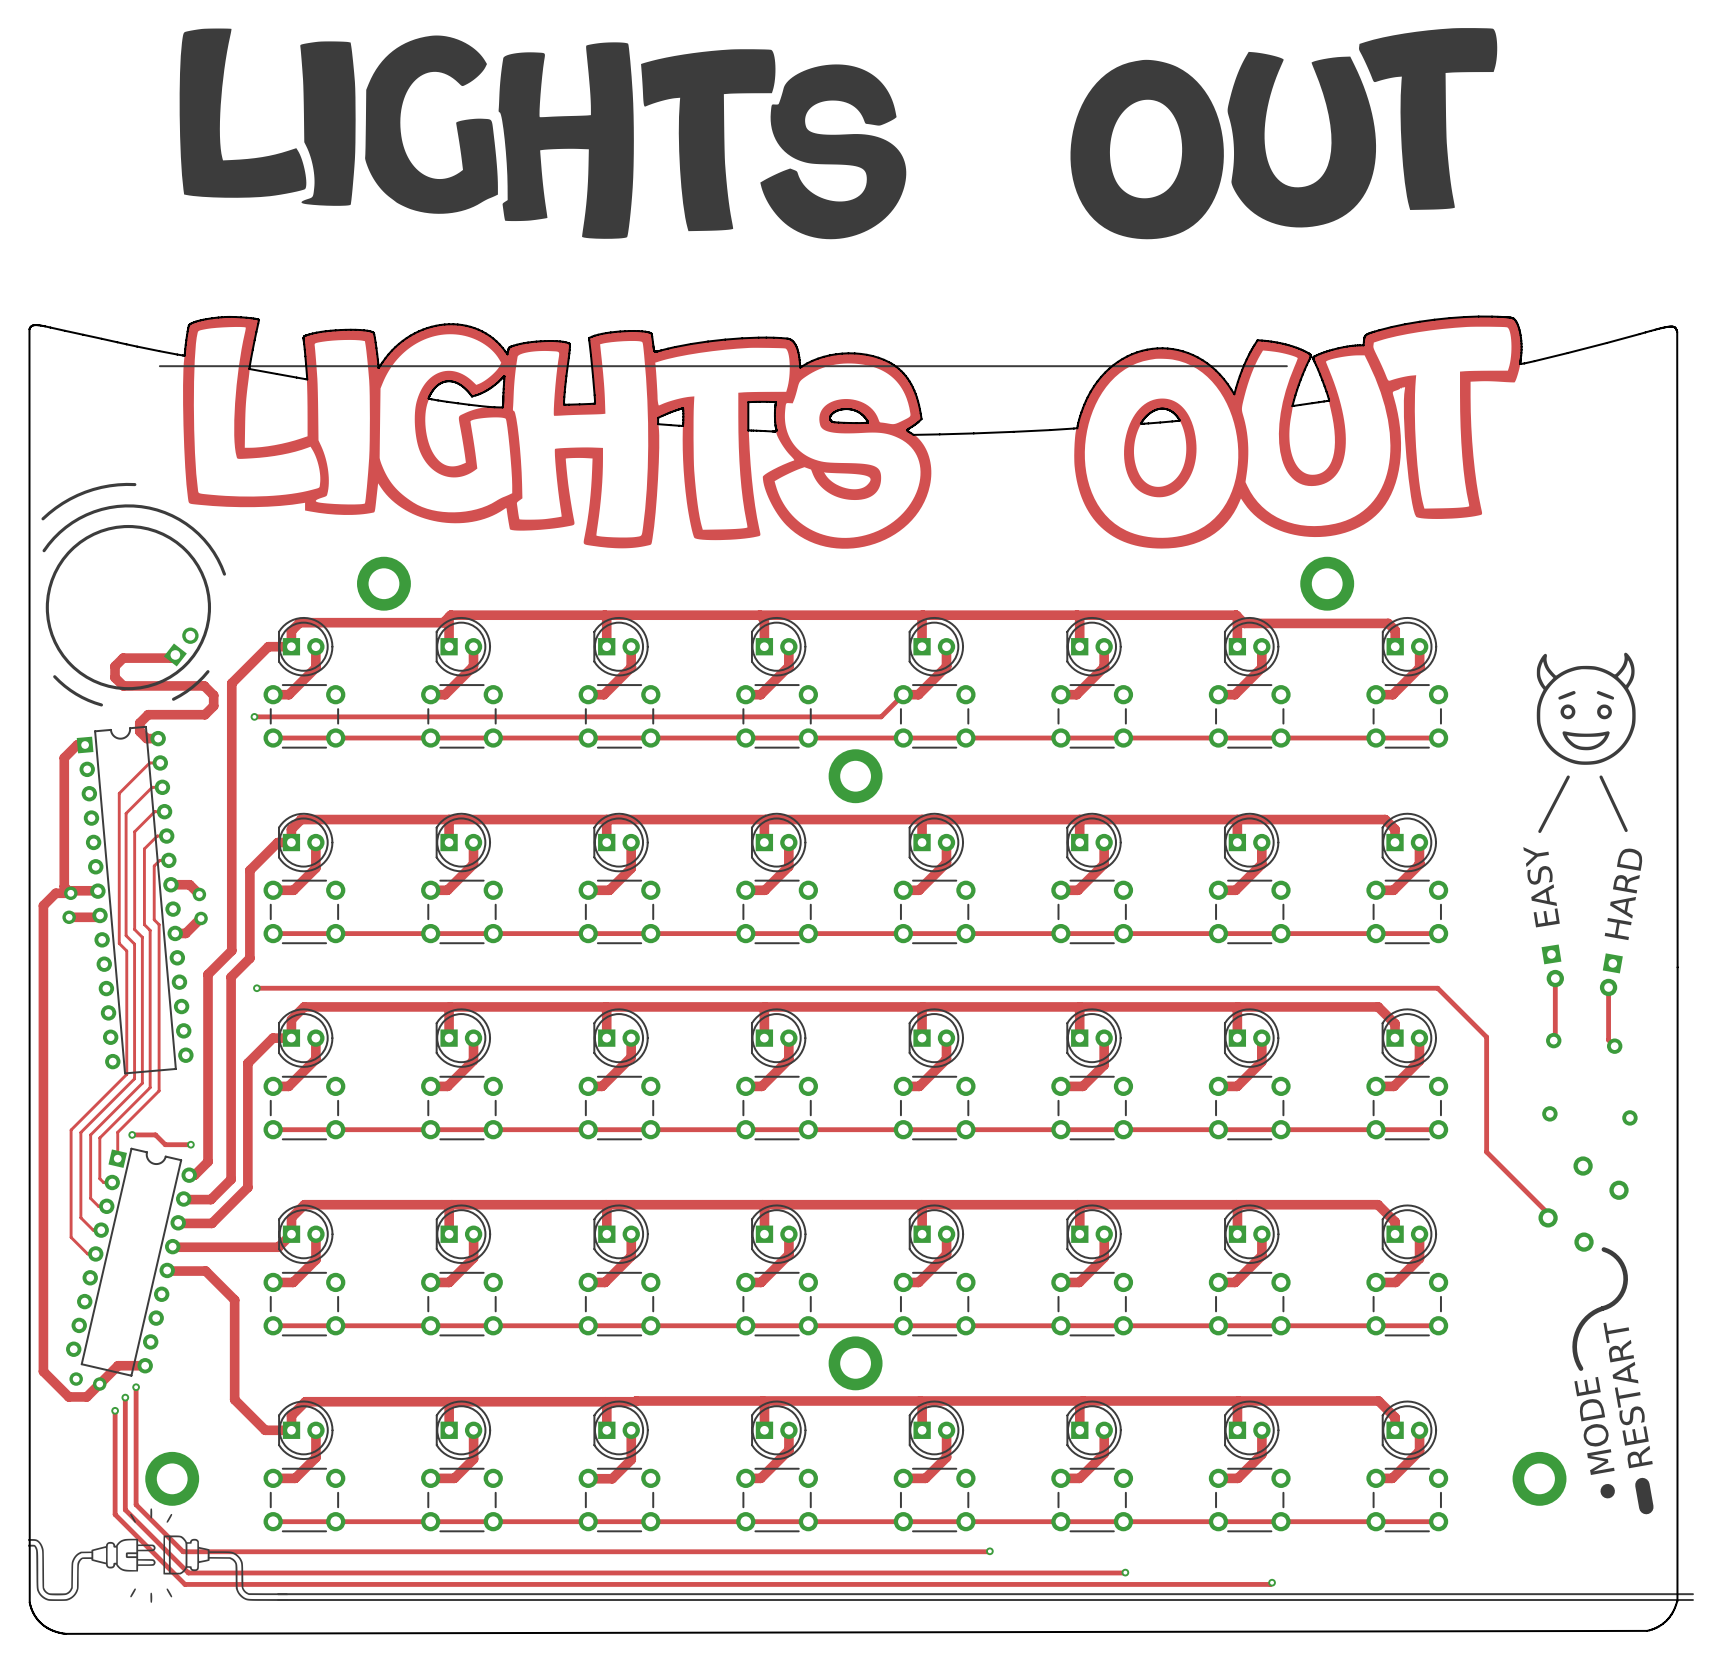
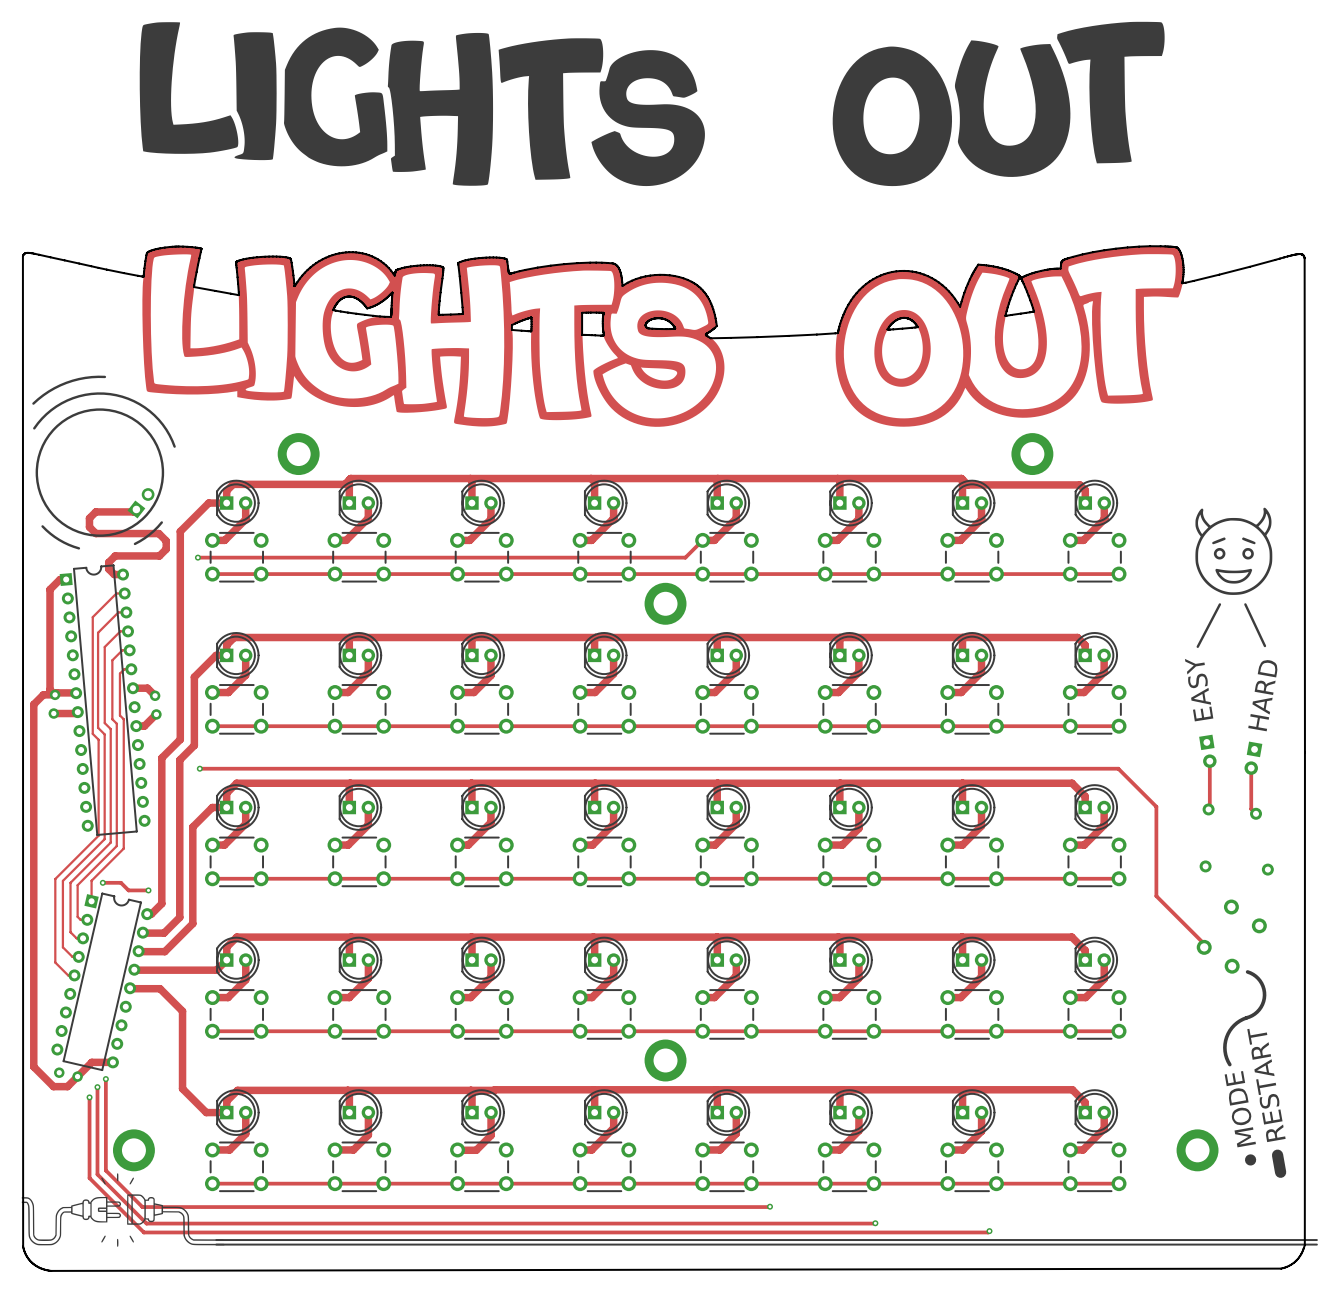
line: (159, 366) (1286, 366) -> none

